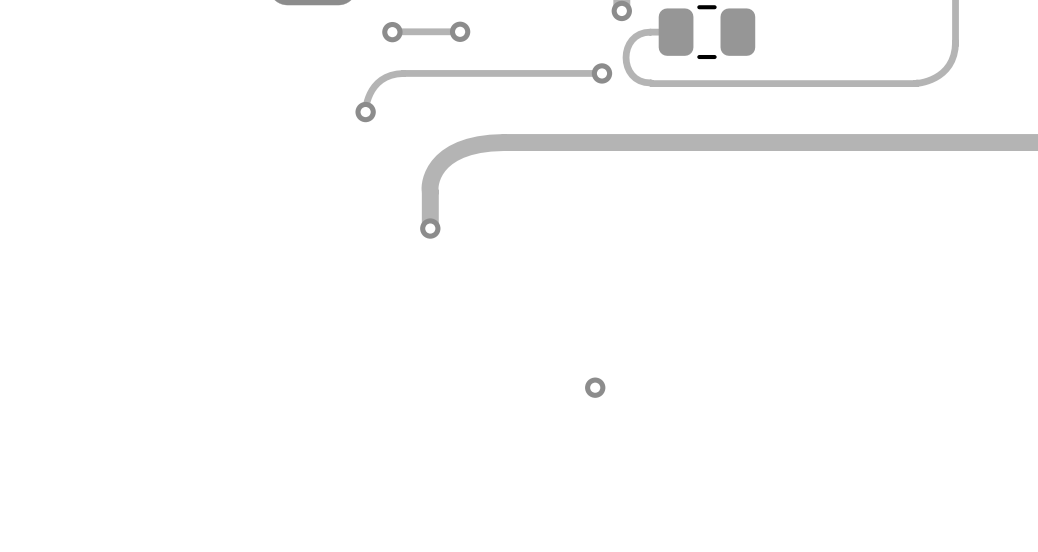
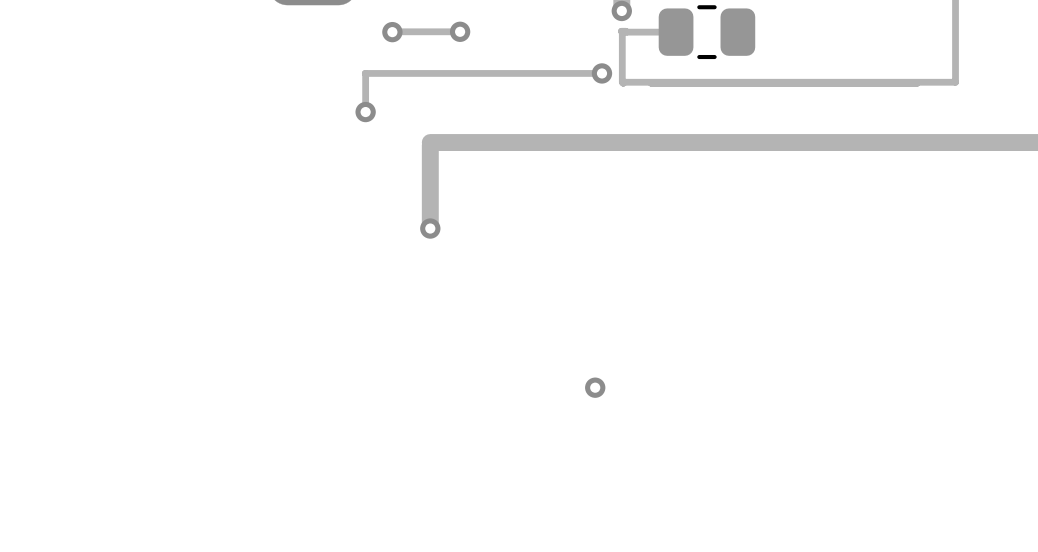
track: (650, 32) (639, 34) (632, 40) (627, 48) (626, 57) (627, 66) (632, 75) (639, 80) (650, 82) -> (650, 32) (621, 31) (623, 83) (955, 82) (955, 44)
track: (955, 41) (953, 55) (946, 69) (931, 79) (915, 83) -> none
track: (403, 73) (390, 75) (377, 83) (368, 97) (365, 113) -> (365, 73) (365, 112)
track: none -> (403, 73) (365, 73)
track: (503, 142) (469, 146) (447, 157) (433, 174) (430, 191) -> none
track: none -> (505, 142) (430, 142) (430, 192)

